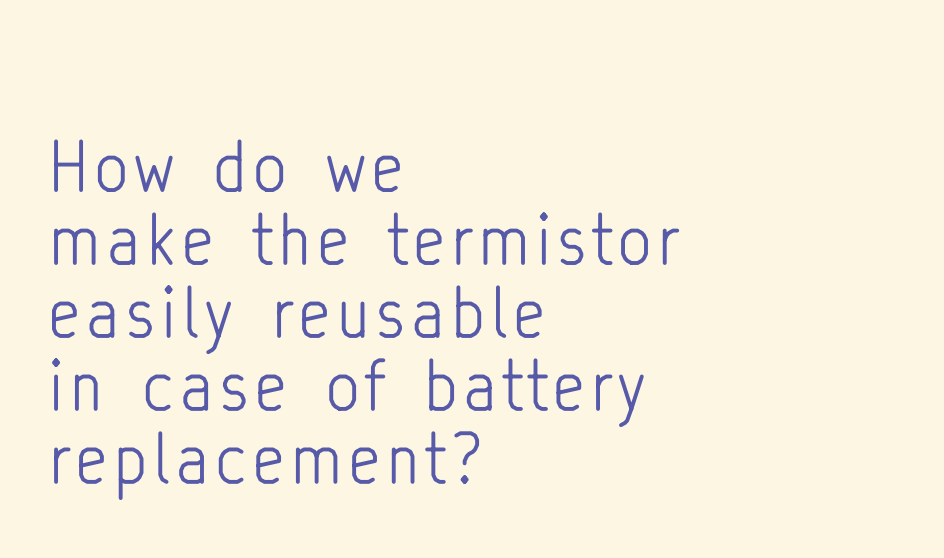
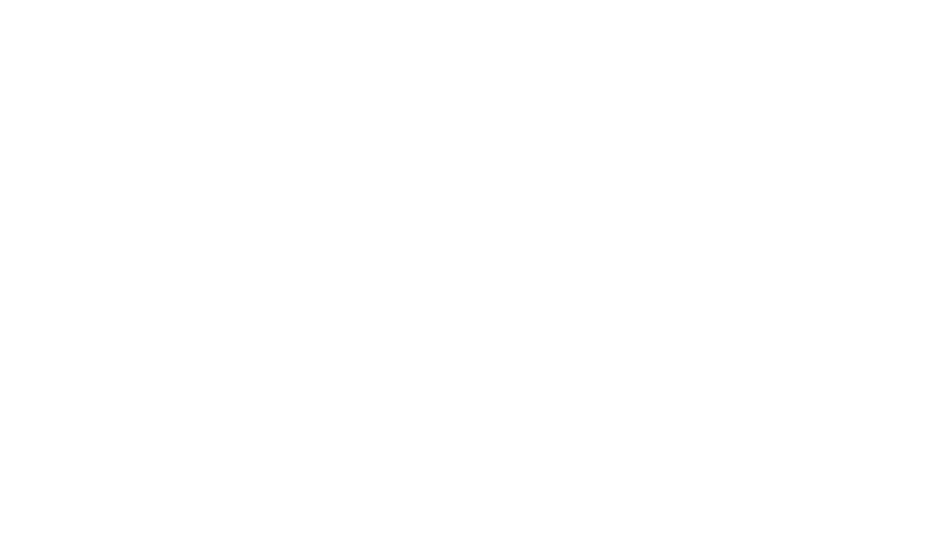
text: How do we (226, 165) -> none
text: make the termistor (366, 238) -> none
text: easily reusable (296, 319) -> none
text: in case of battery (347, 392) -> none
text: replacement? (266, 465) -> none

